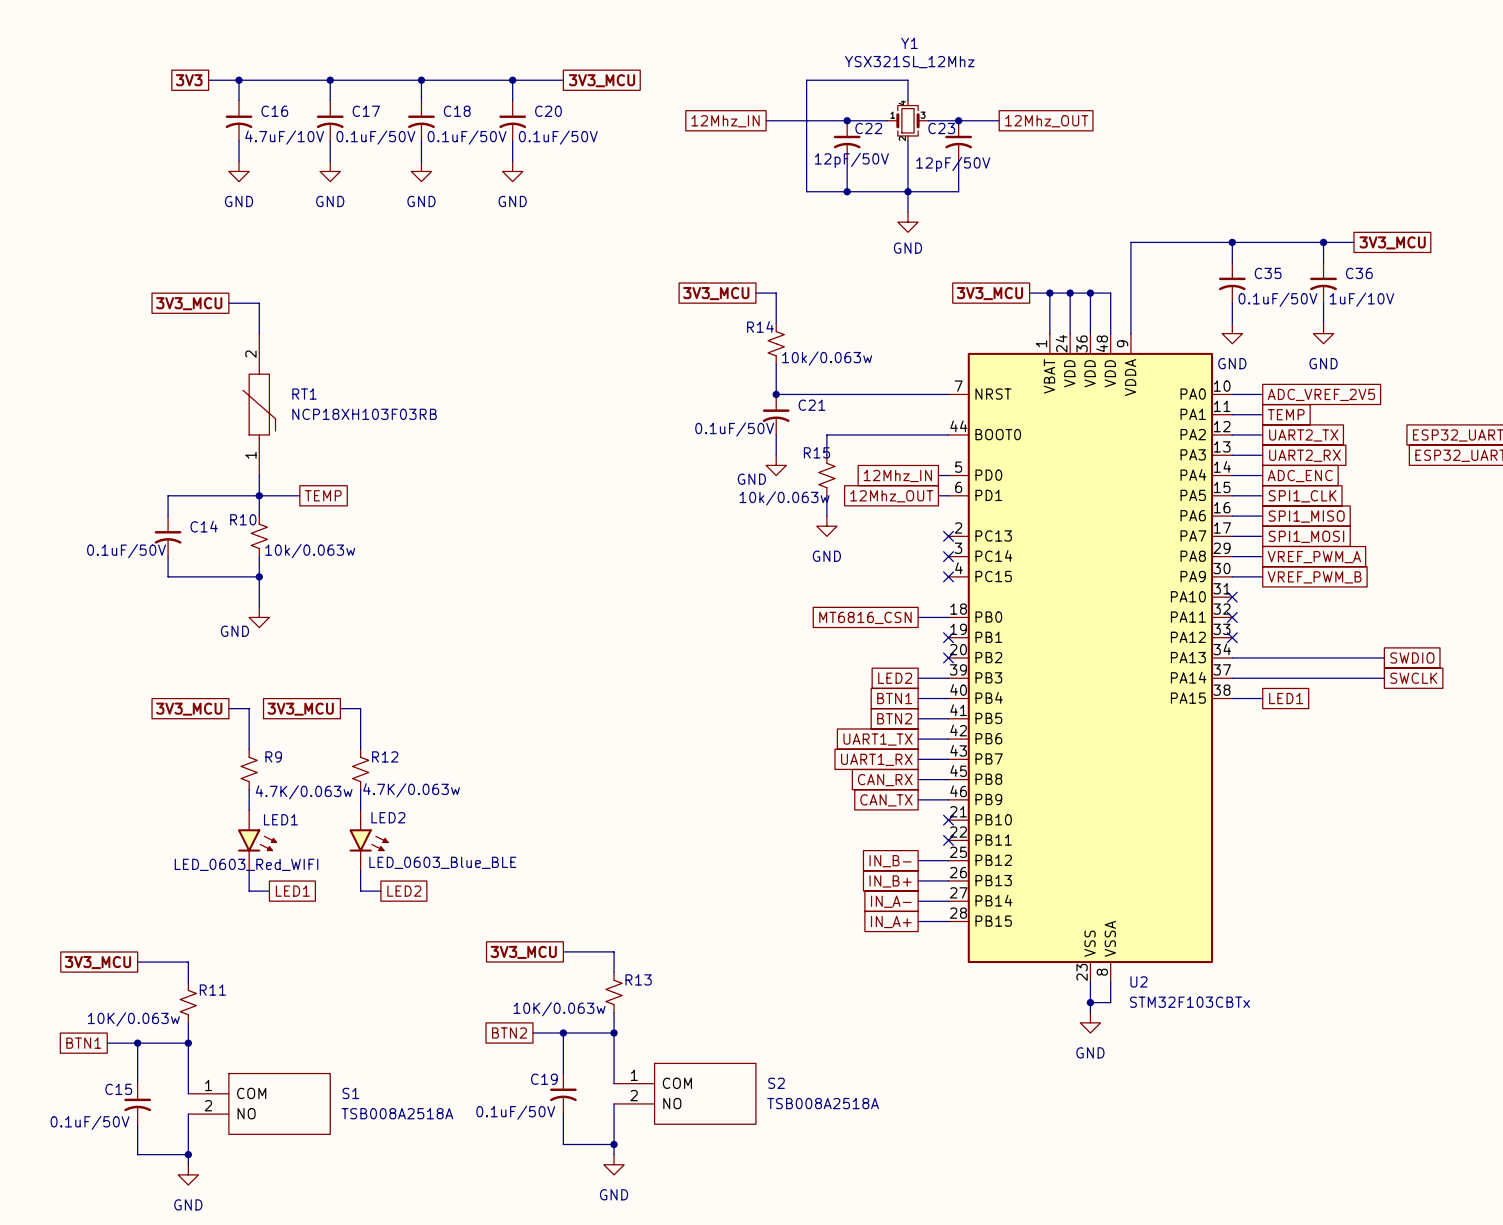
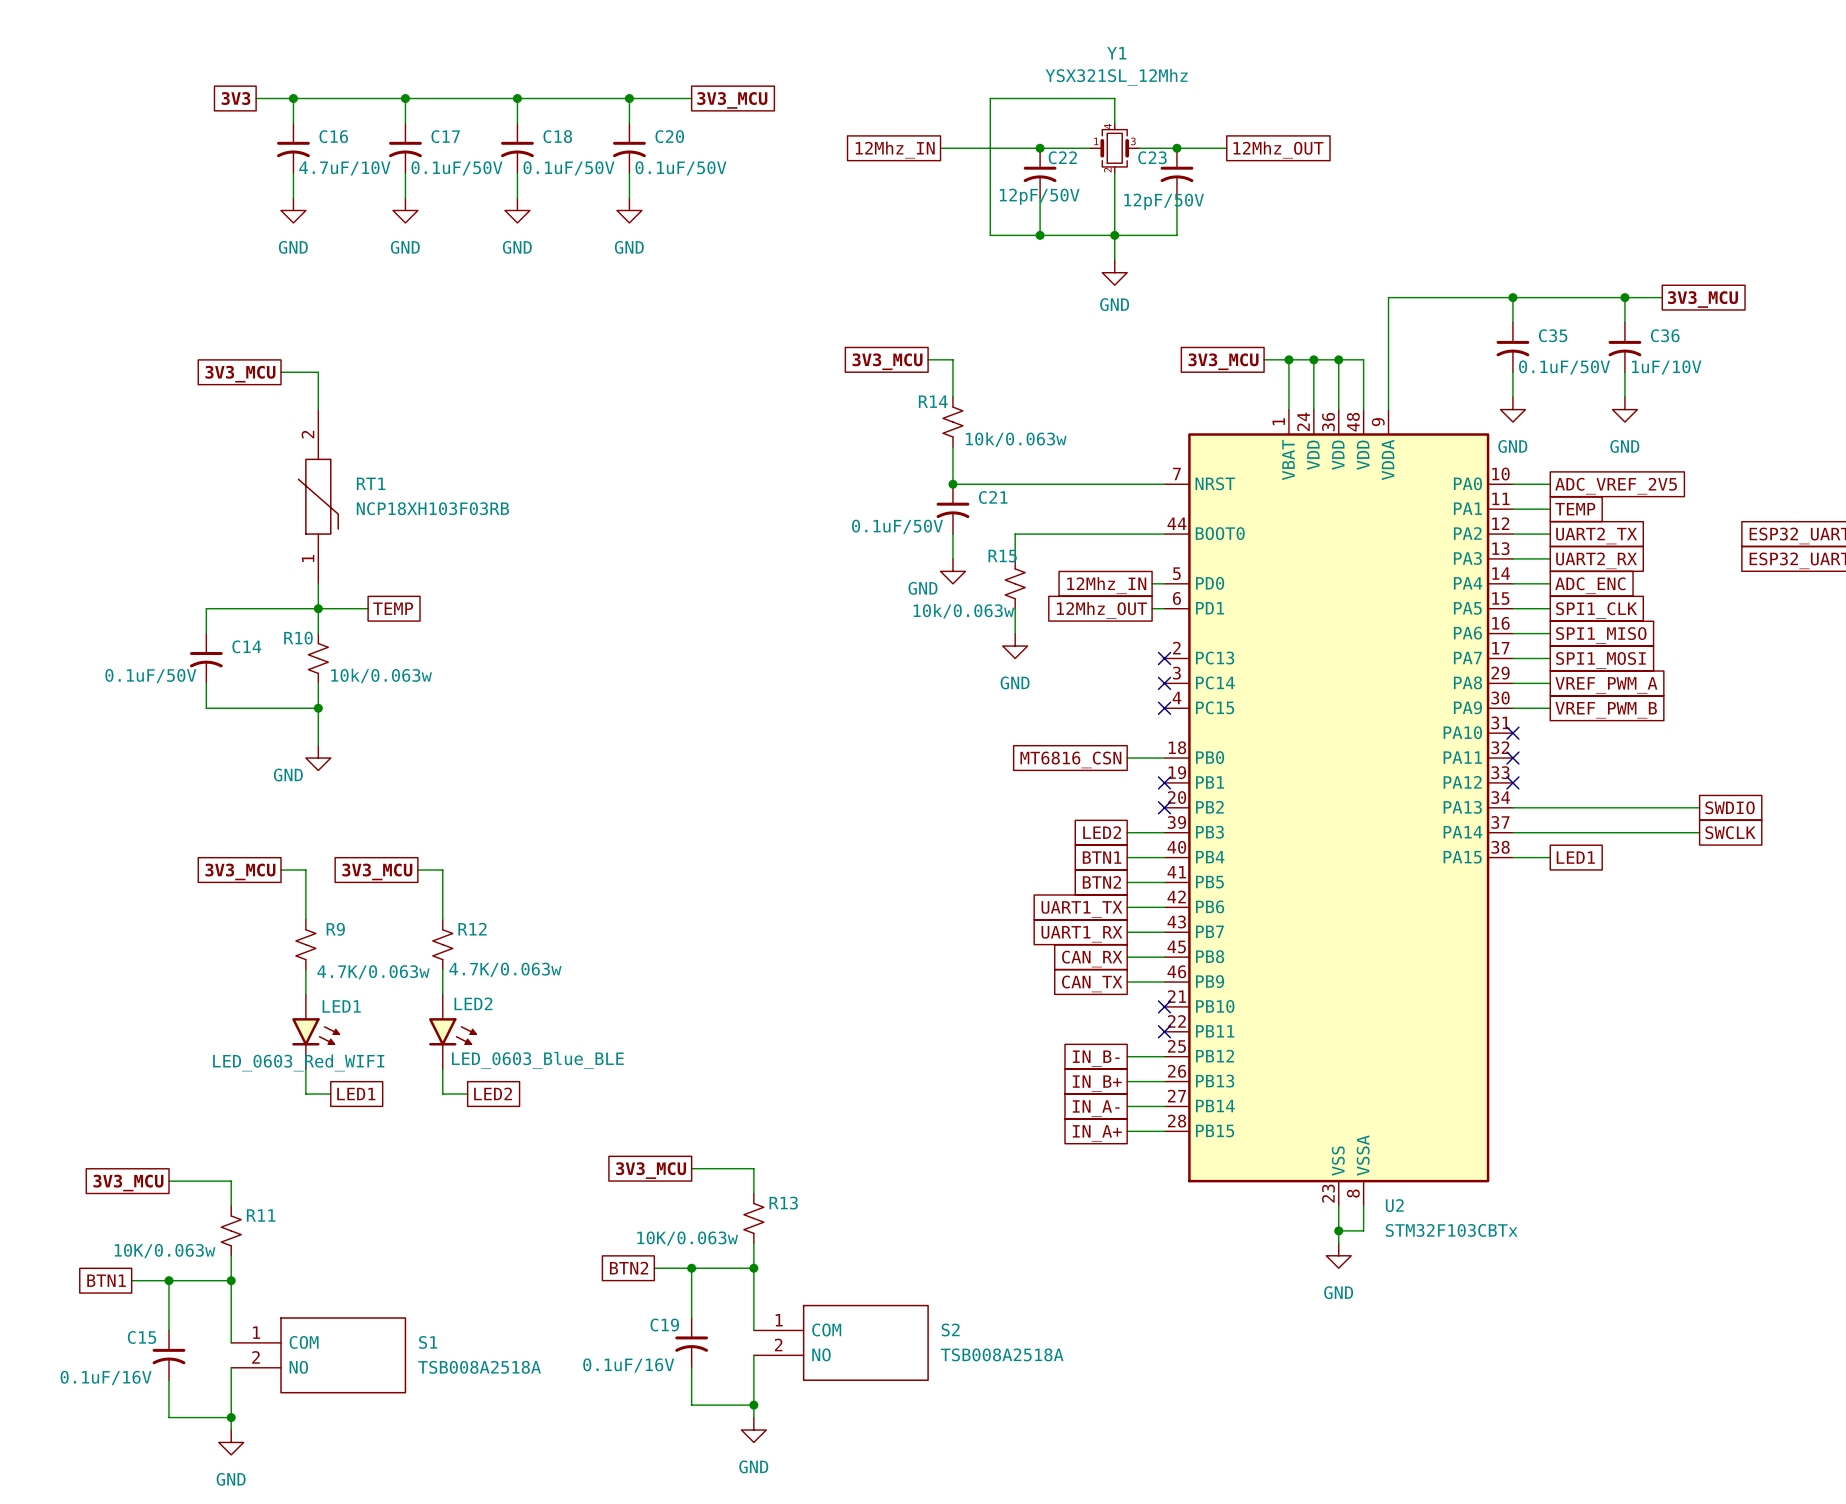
C19 value: 0.1uF/50V (515, 1112) -> 0.1uF/16V (628, 1365)
C15 value: 0.1uF/50V (90, 1122) -> 0.1uF/16V (106, 1377)

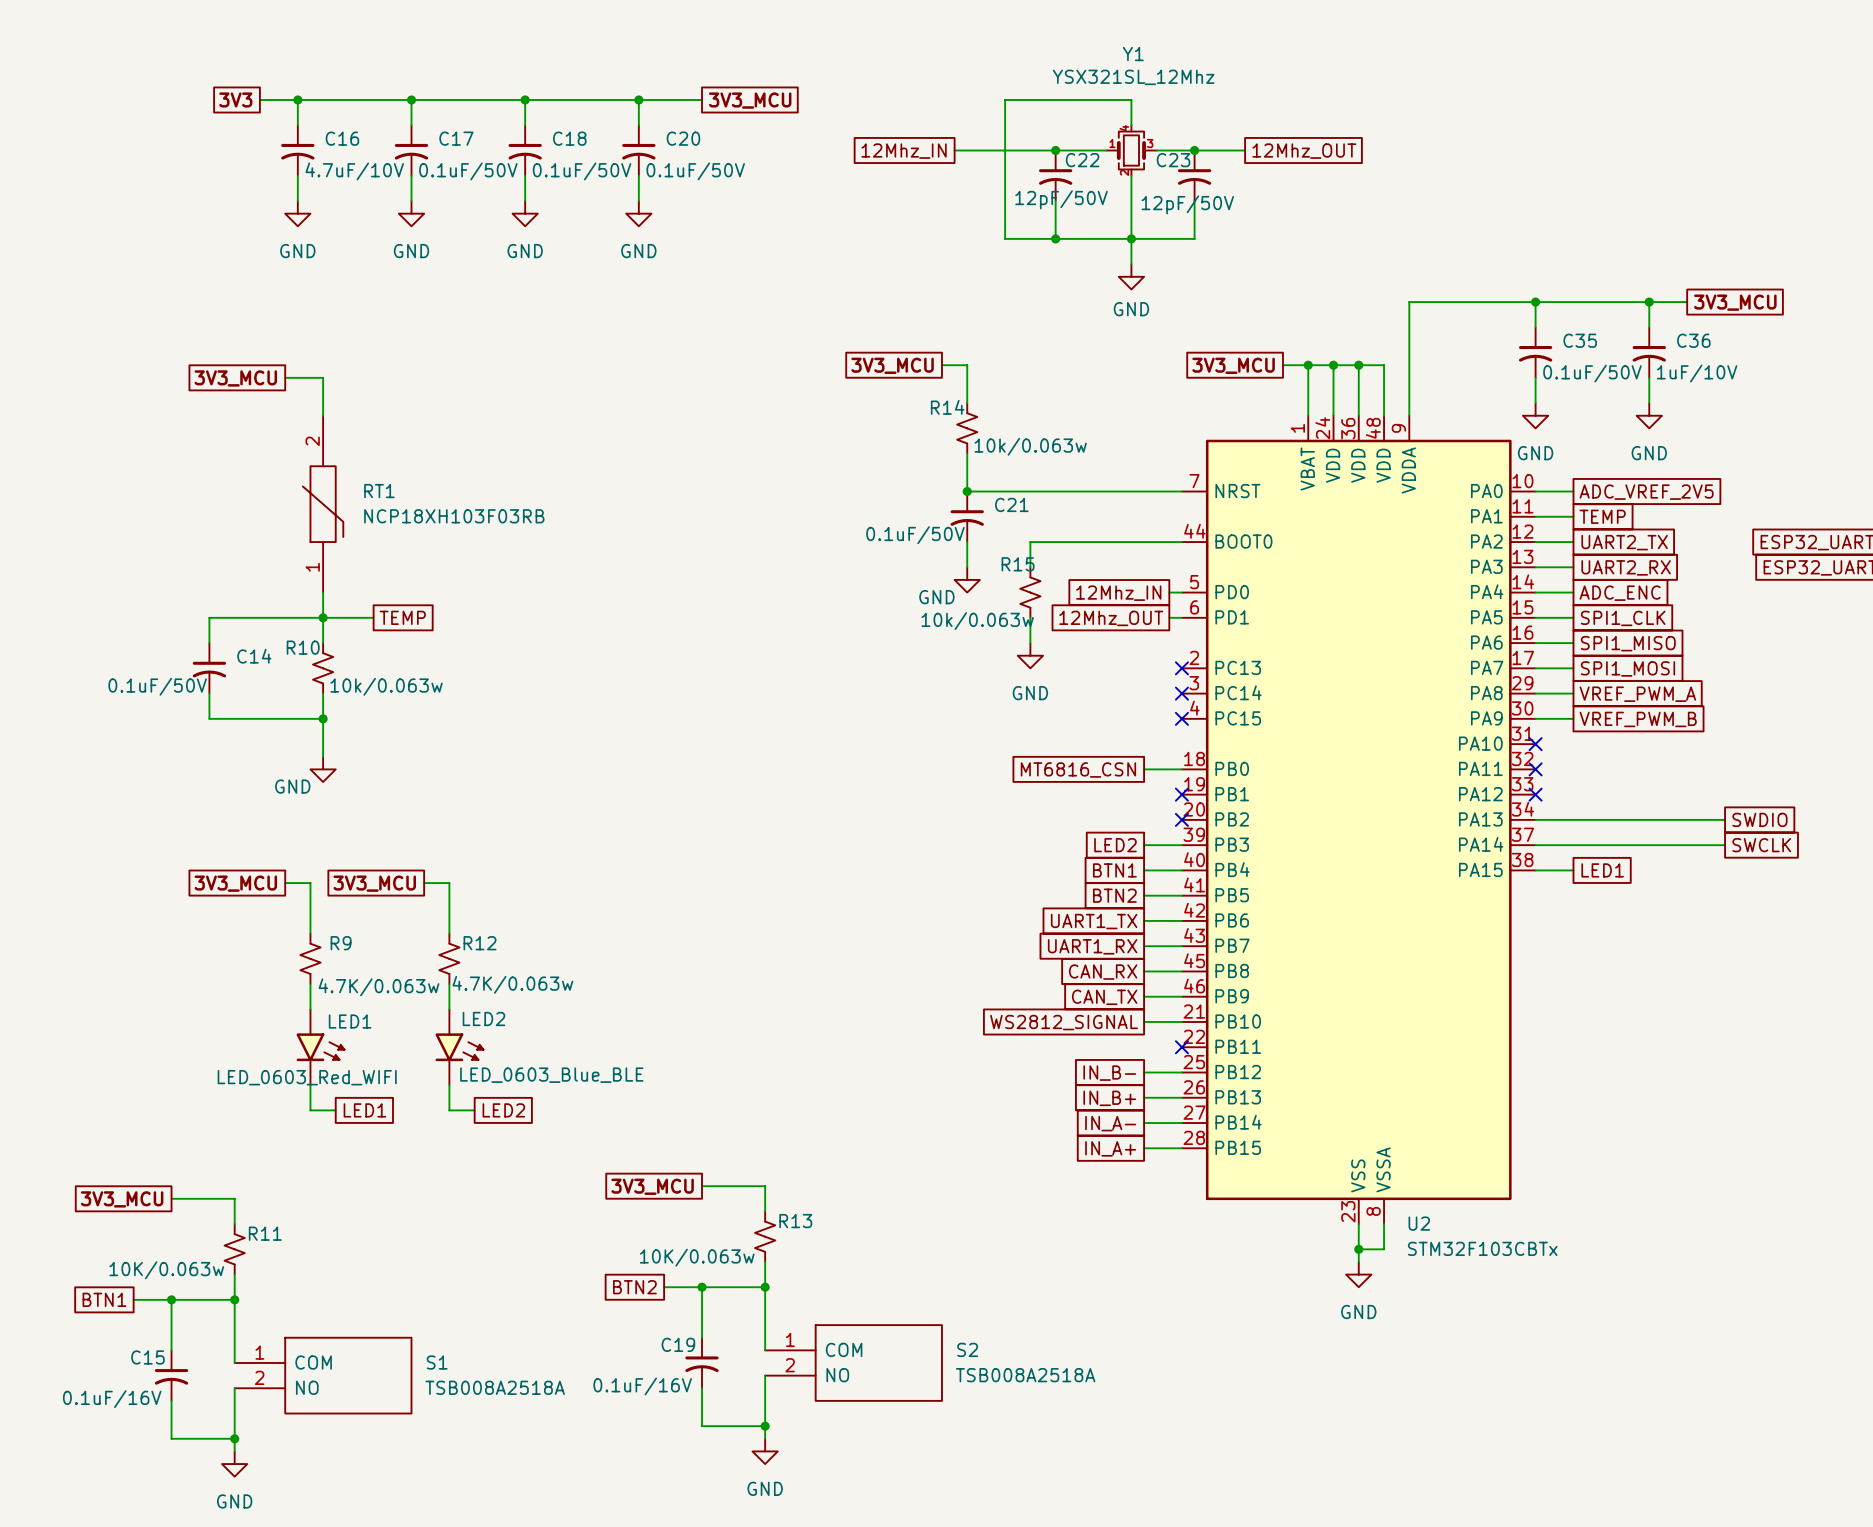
wire: none -> (1144, 1021) (1181, 1021)
no-connect mark: (1164, 1006) -> none
global label: none -> WS2812_SIGNAL (1064, 1022)

